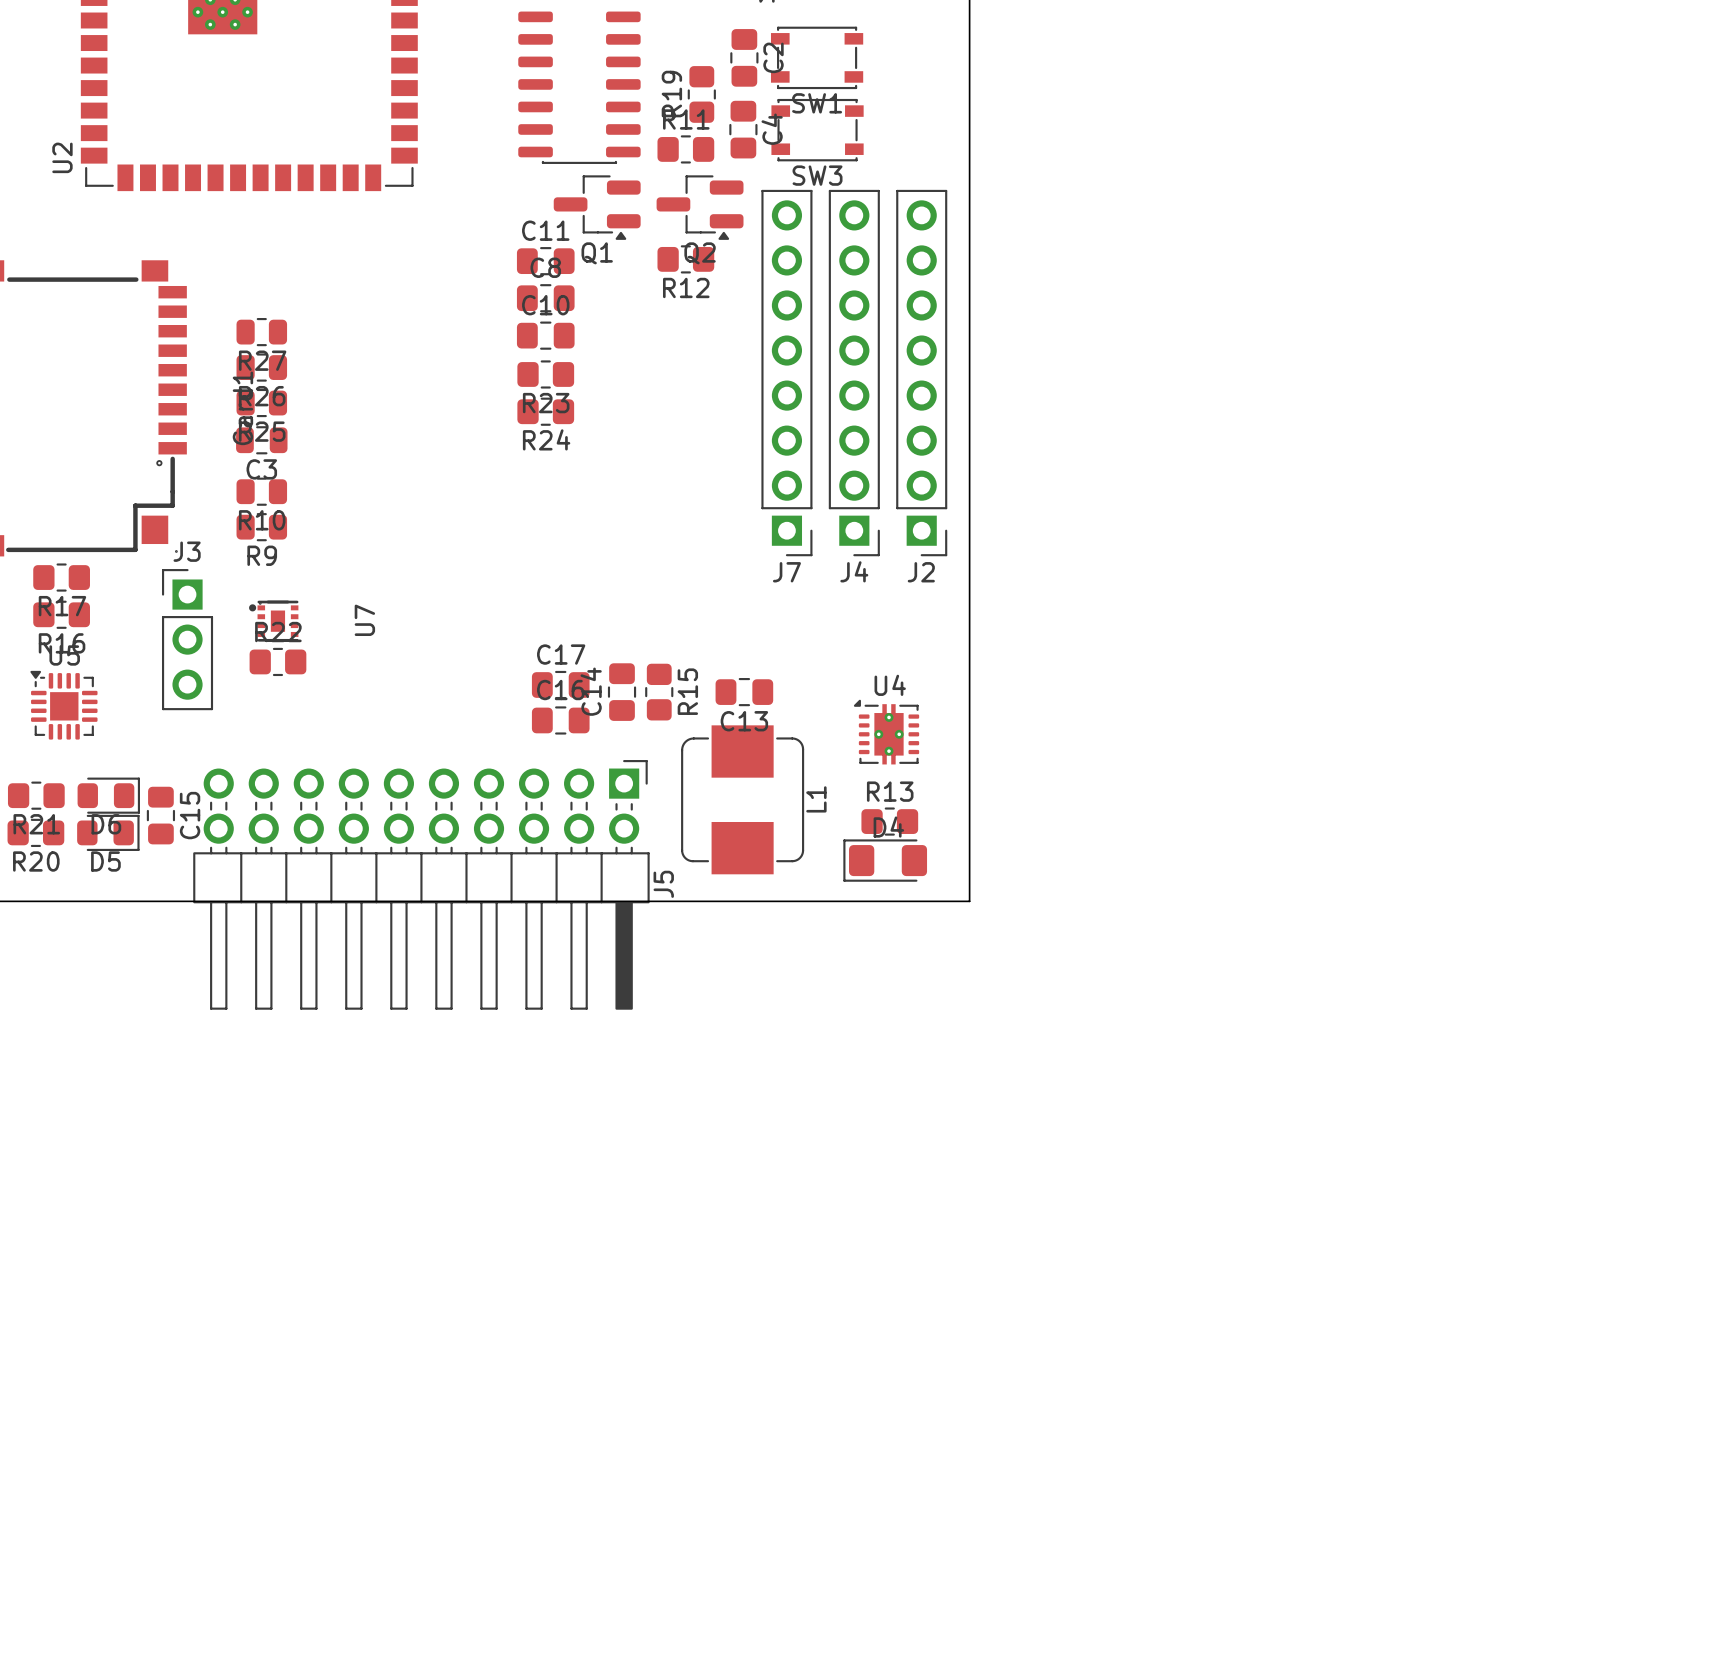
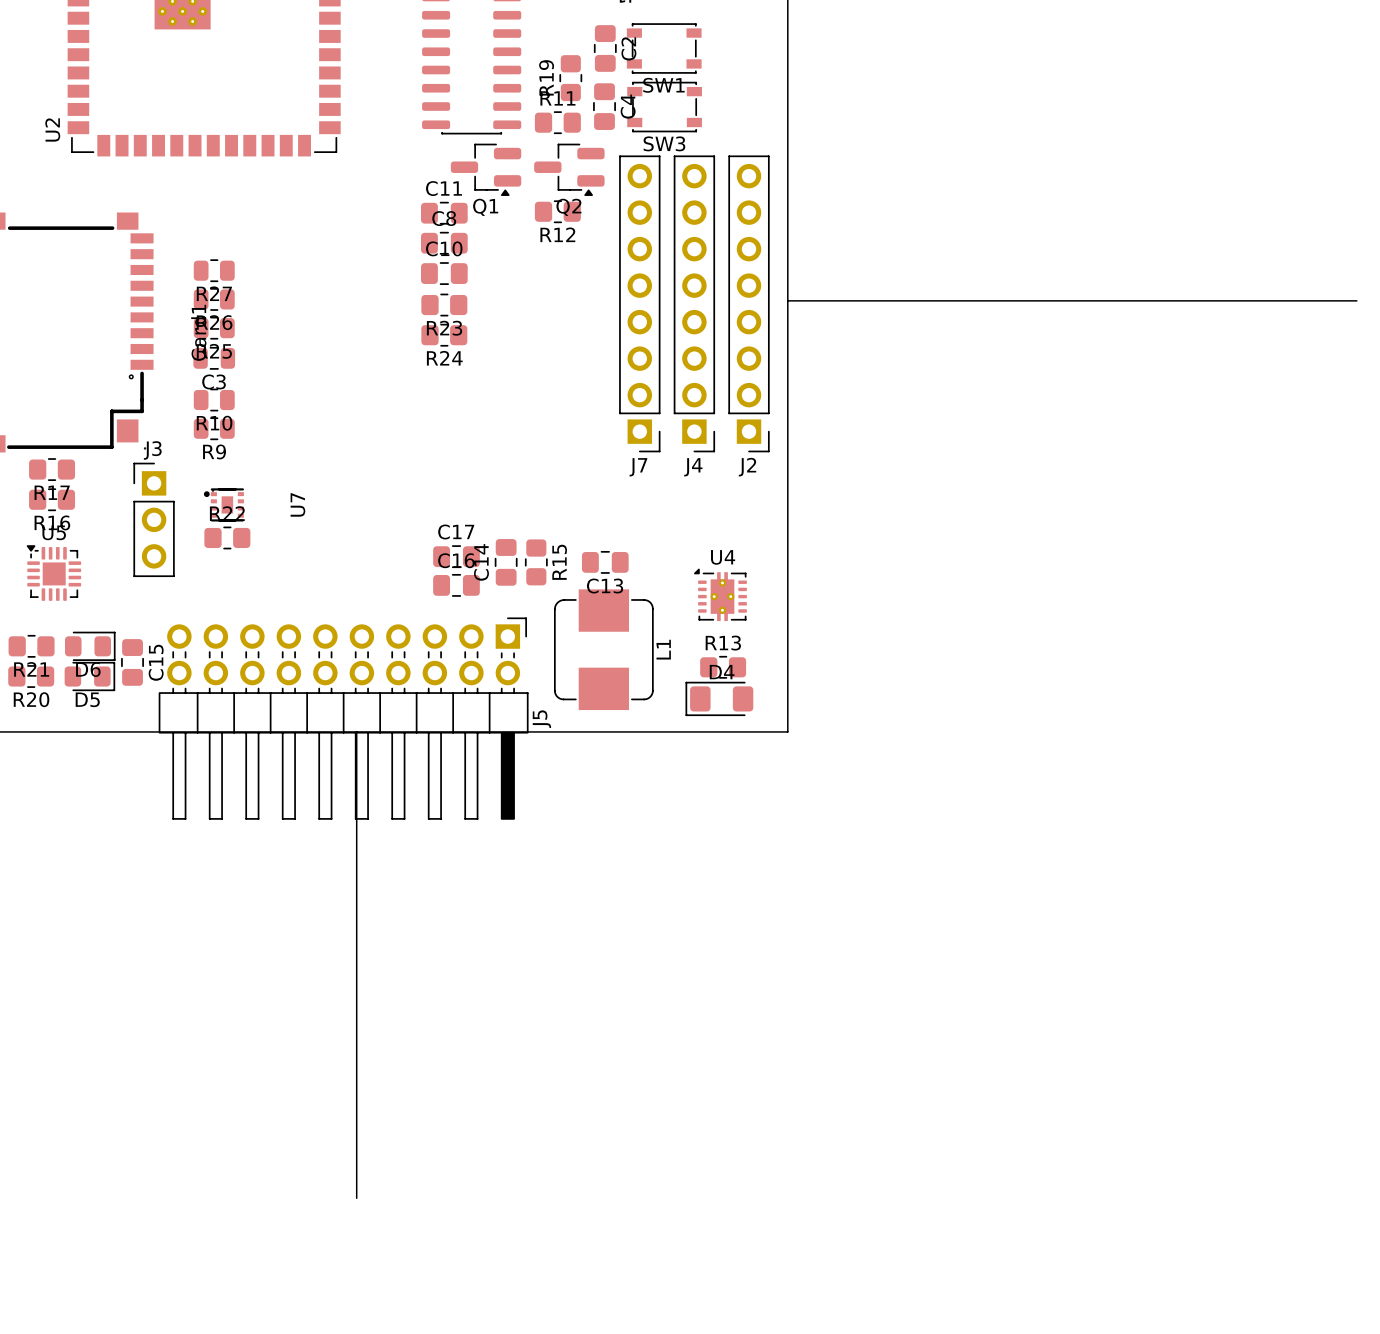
board edge: none -> (787, 300) (1356, 300)
board edge: none -> (356, 731) (356, 1198)

